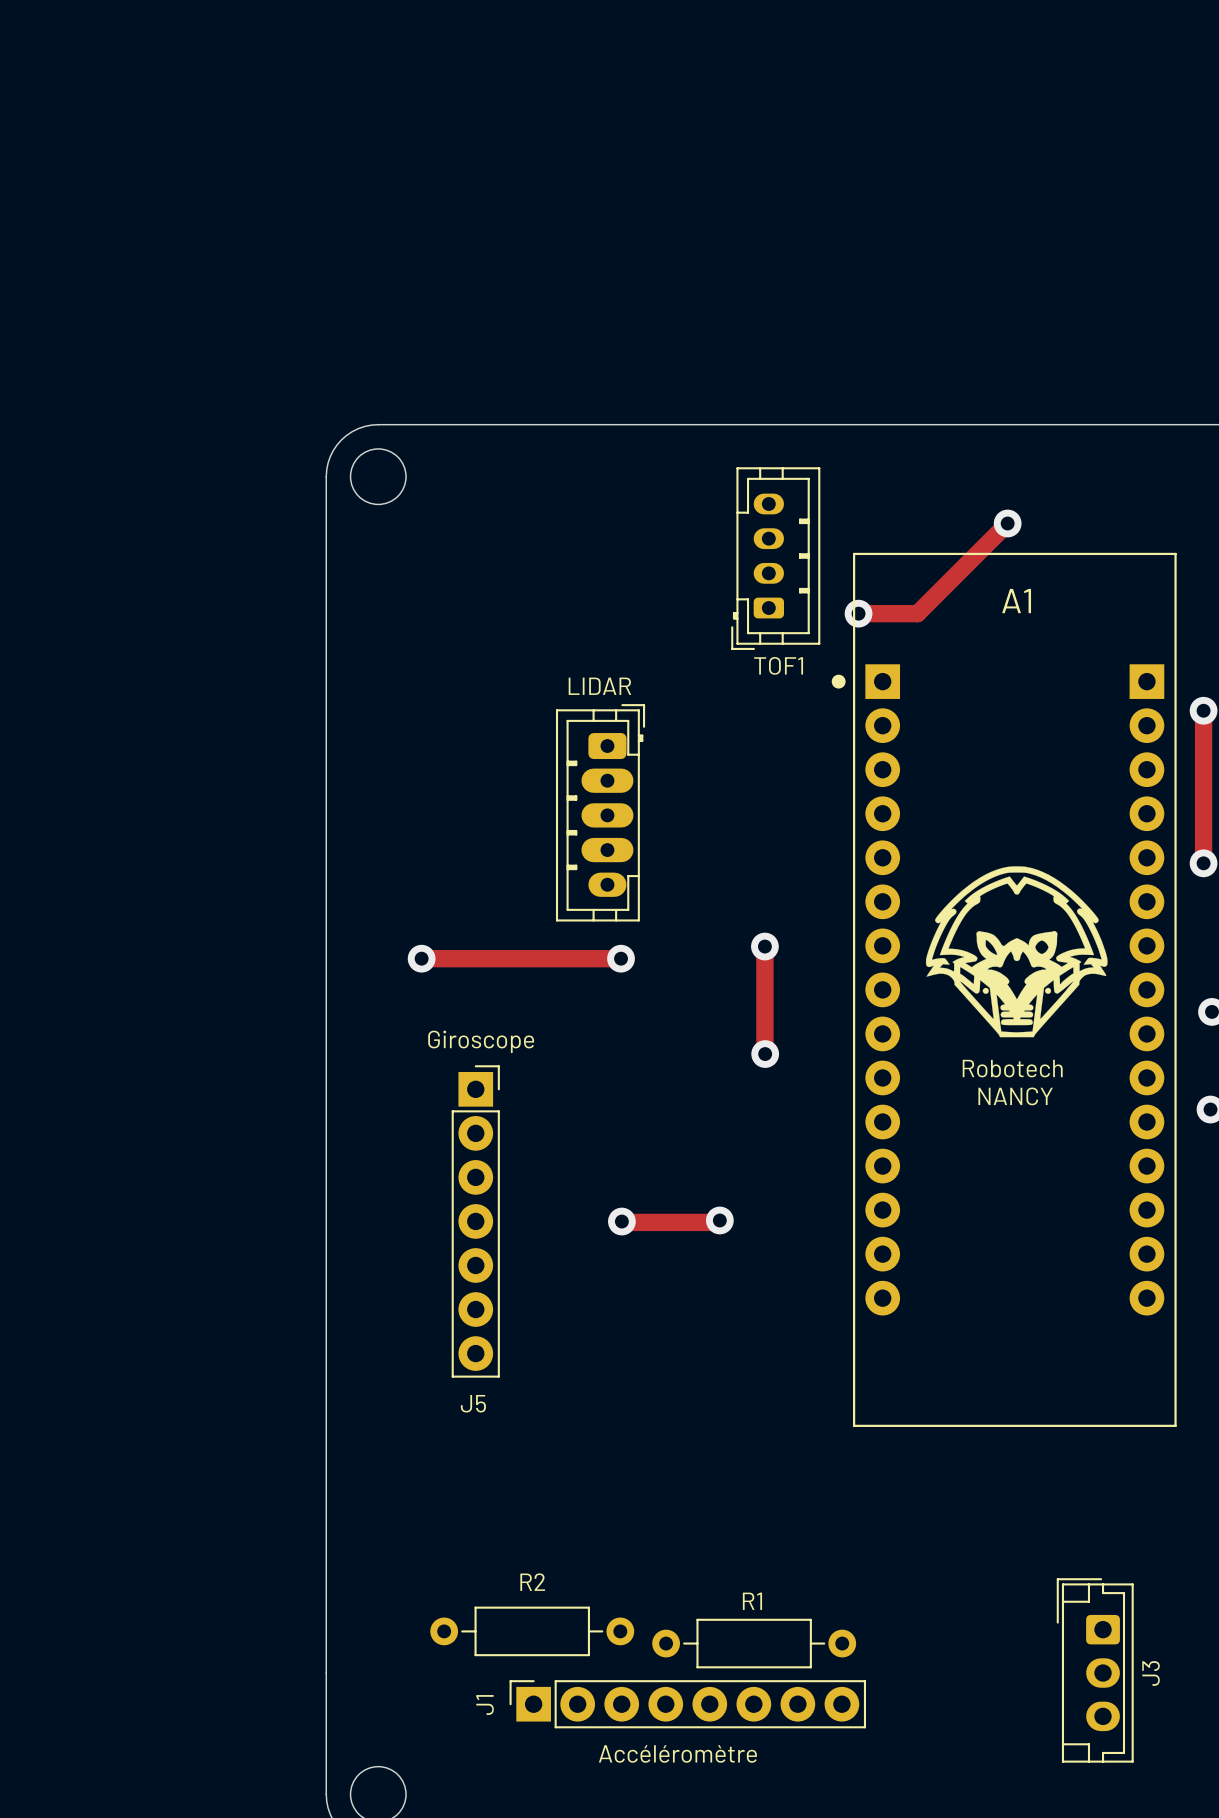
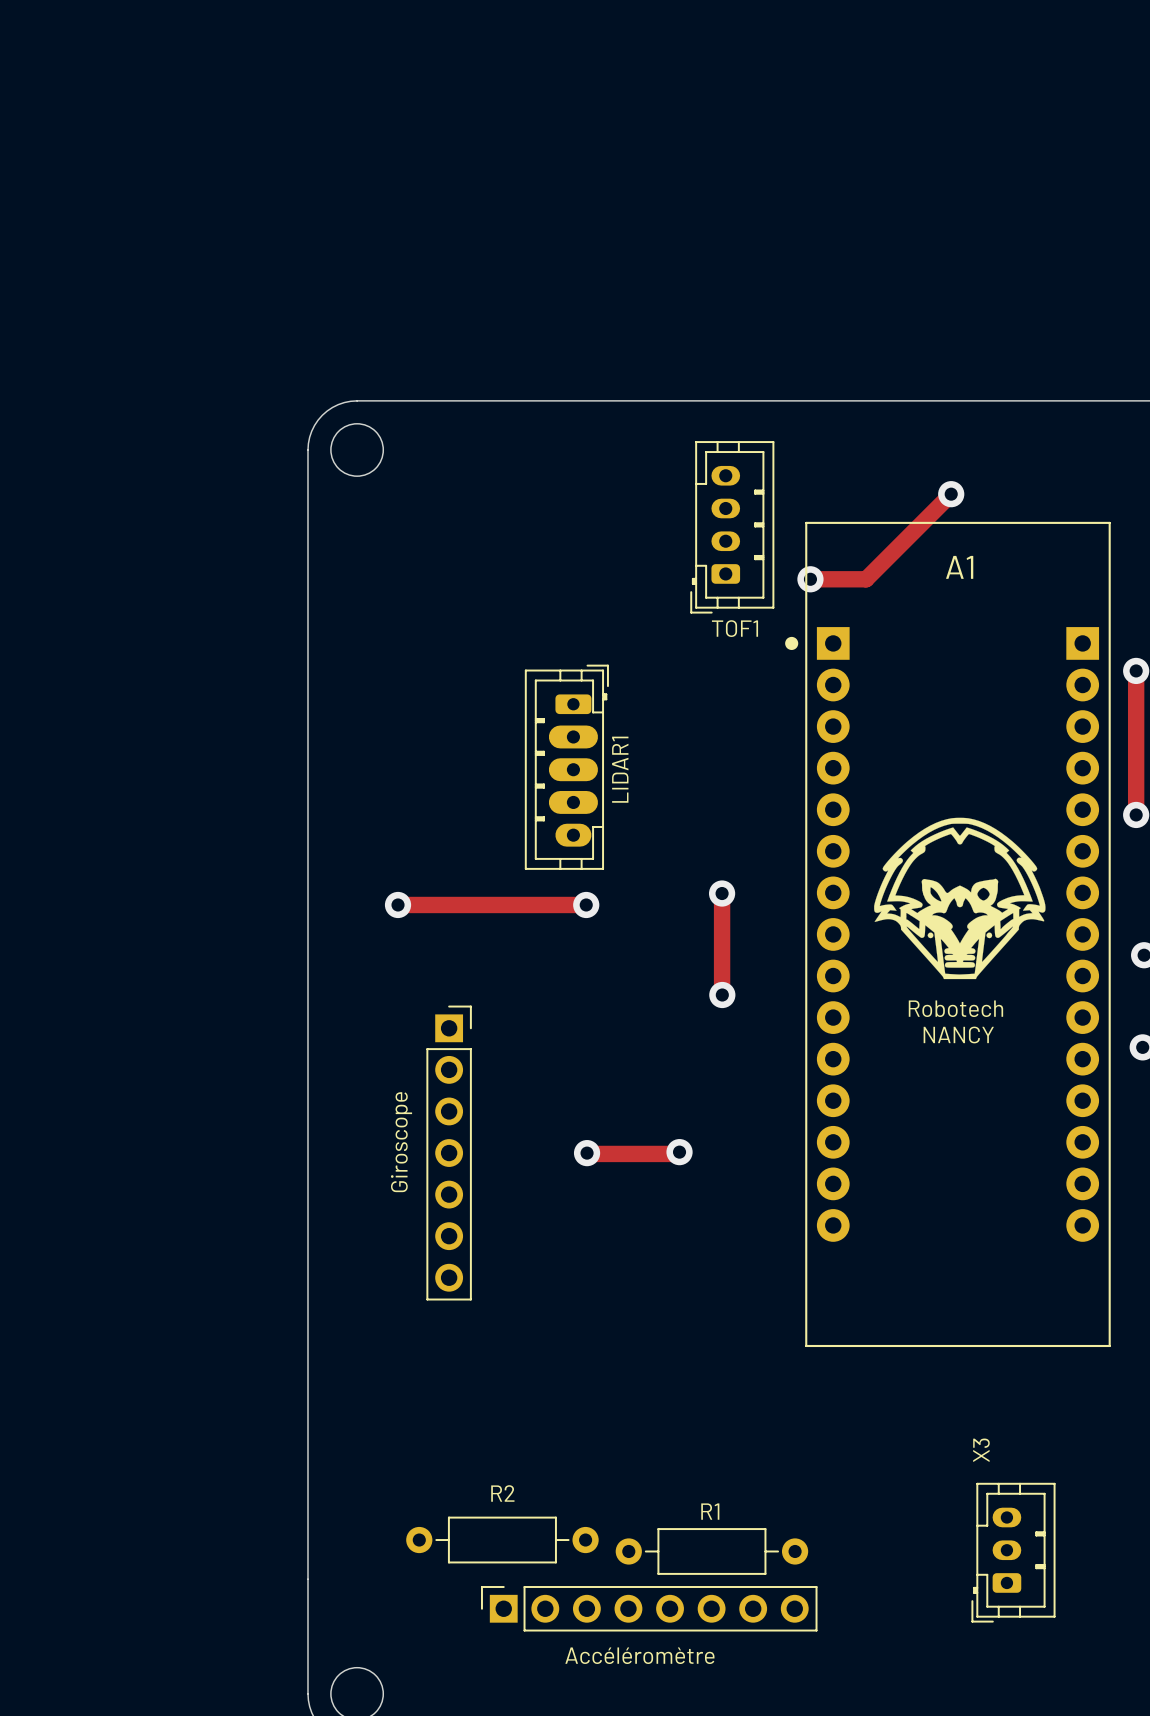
LIDAR: (600, 812) -> none
LIDAR1: none -> (566, 767)
text rotation: 0° (481, 1041) -> 90° counterclockwise (401, 1142)
text position: Giroscope (481, 1041) -> Giroscope (401, 1142)
J5: (475, 1221) -> none
part: none -> (449, 1153)
text: none -> X3 (981, 1450)
part: none -> (1013, 1552)
J3: (1095, 1670) -> none
J1: (687, 1704) -> none
part: none -> (649, 1608)

